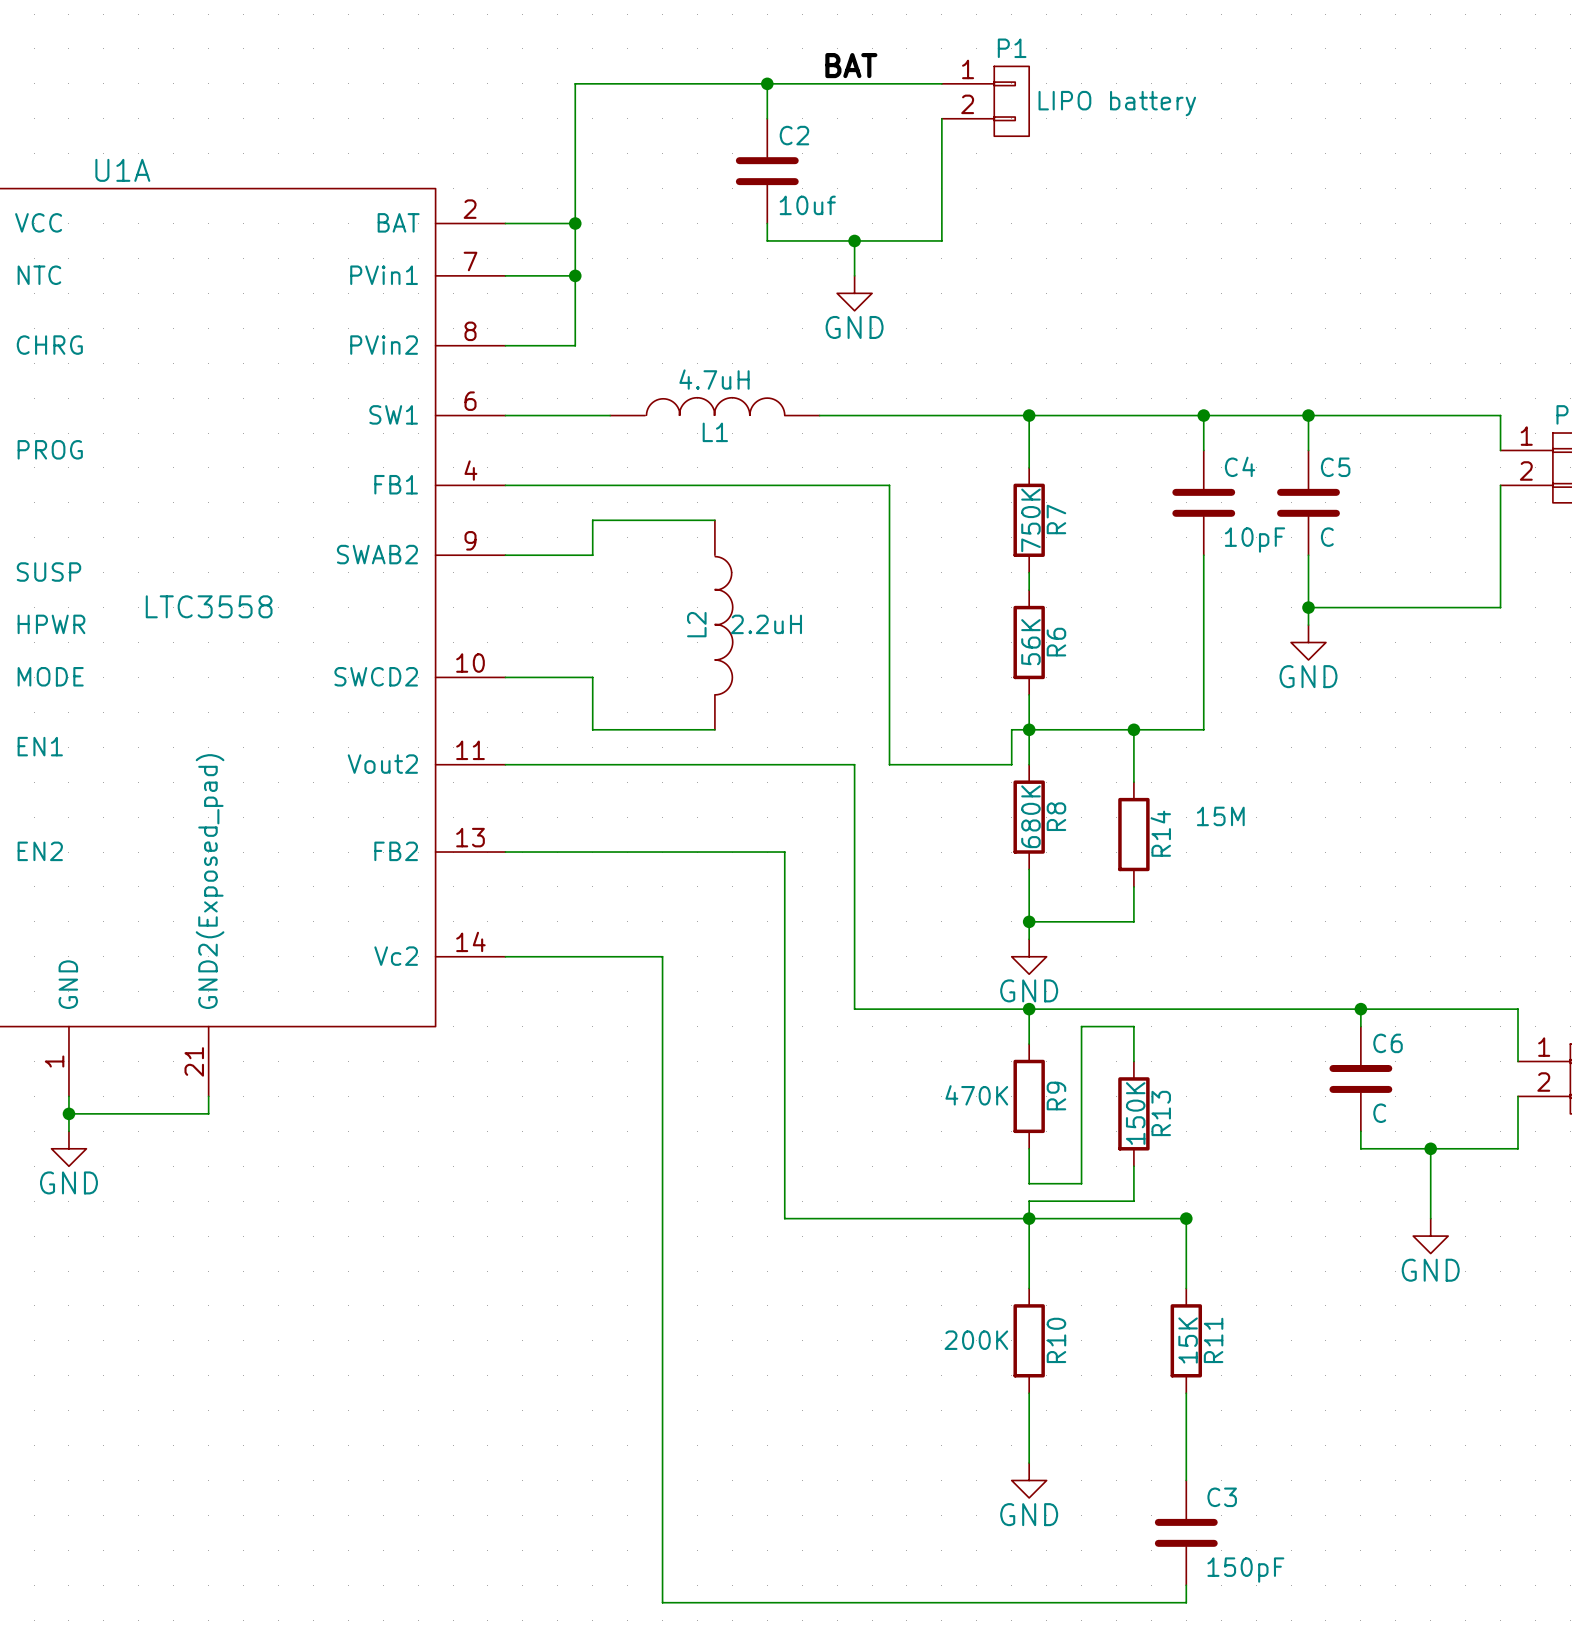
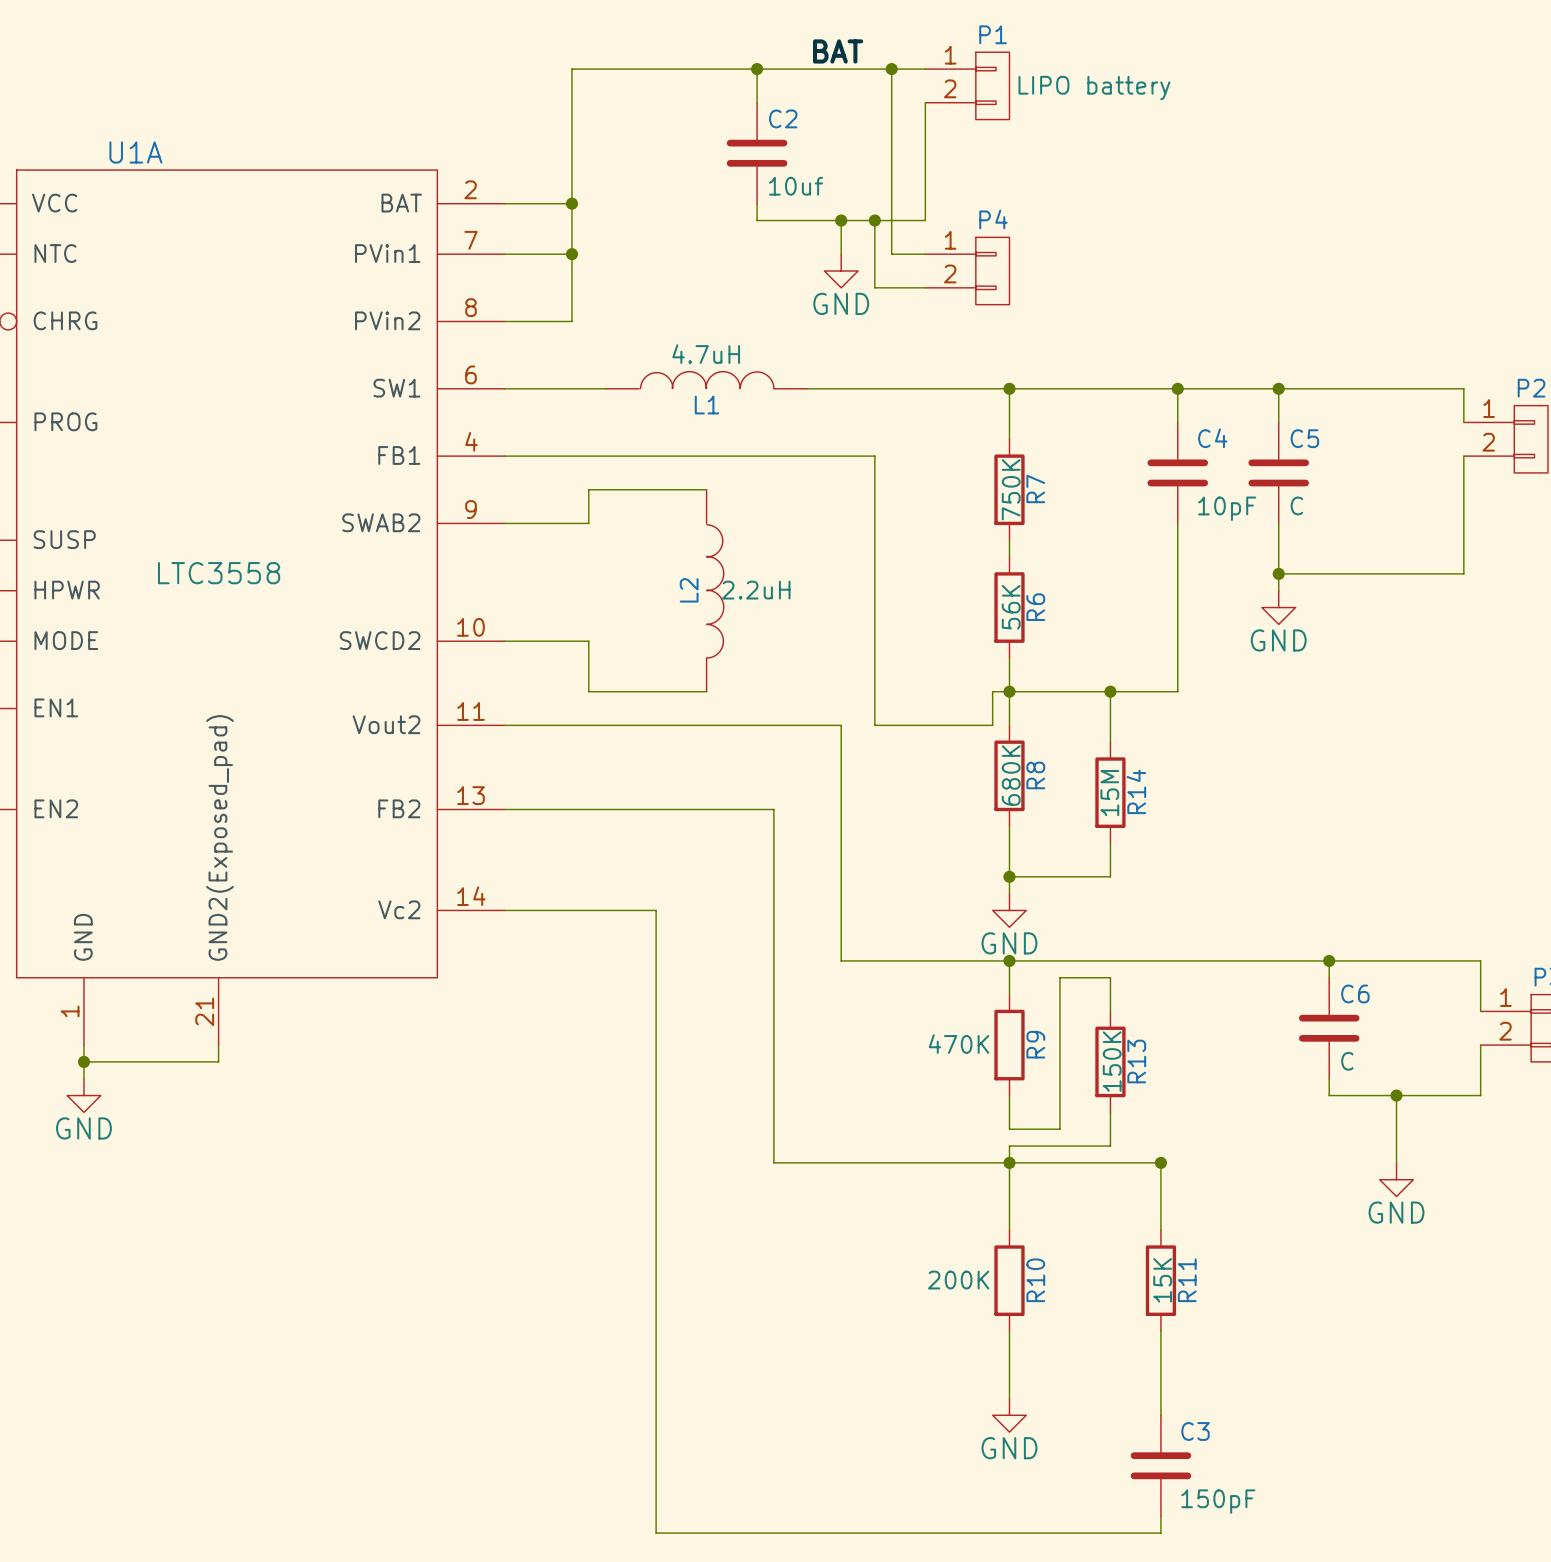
wire: none -> (891, 69) (891, 254) (925, 254)
junction: none -> (891, 69)
wire: none -> (874, 220) (874, 287) (925, 287)
junction: none -> (874, 220)
P4: none -> (967, 271)
R14 value rotation: 0° (1220, 816) -> 90° counterclockwise (1109, 793)
R14 value position: 15M (1220, 816) -> 15M (1109, 793)

